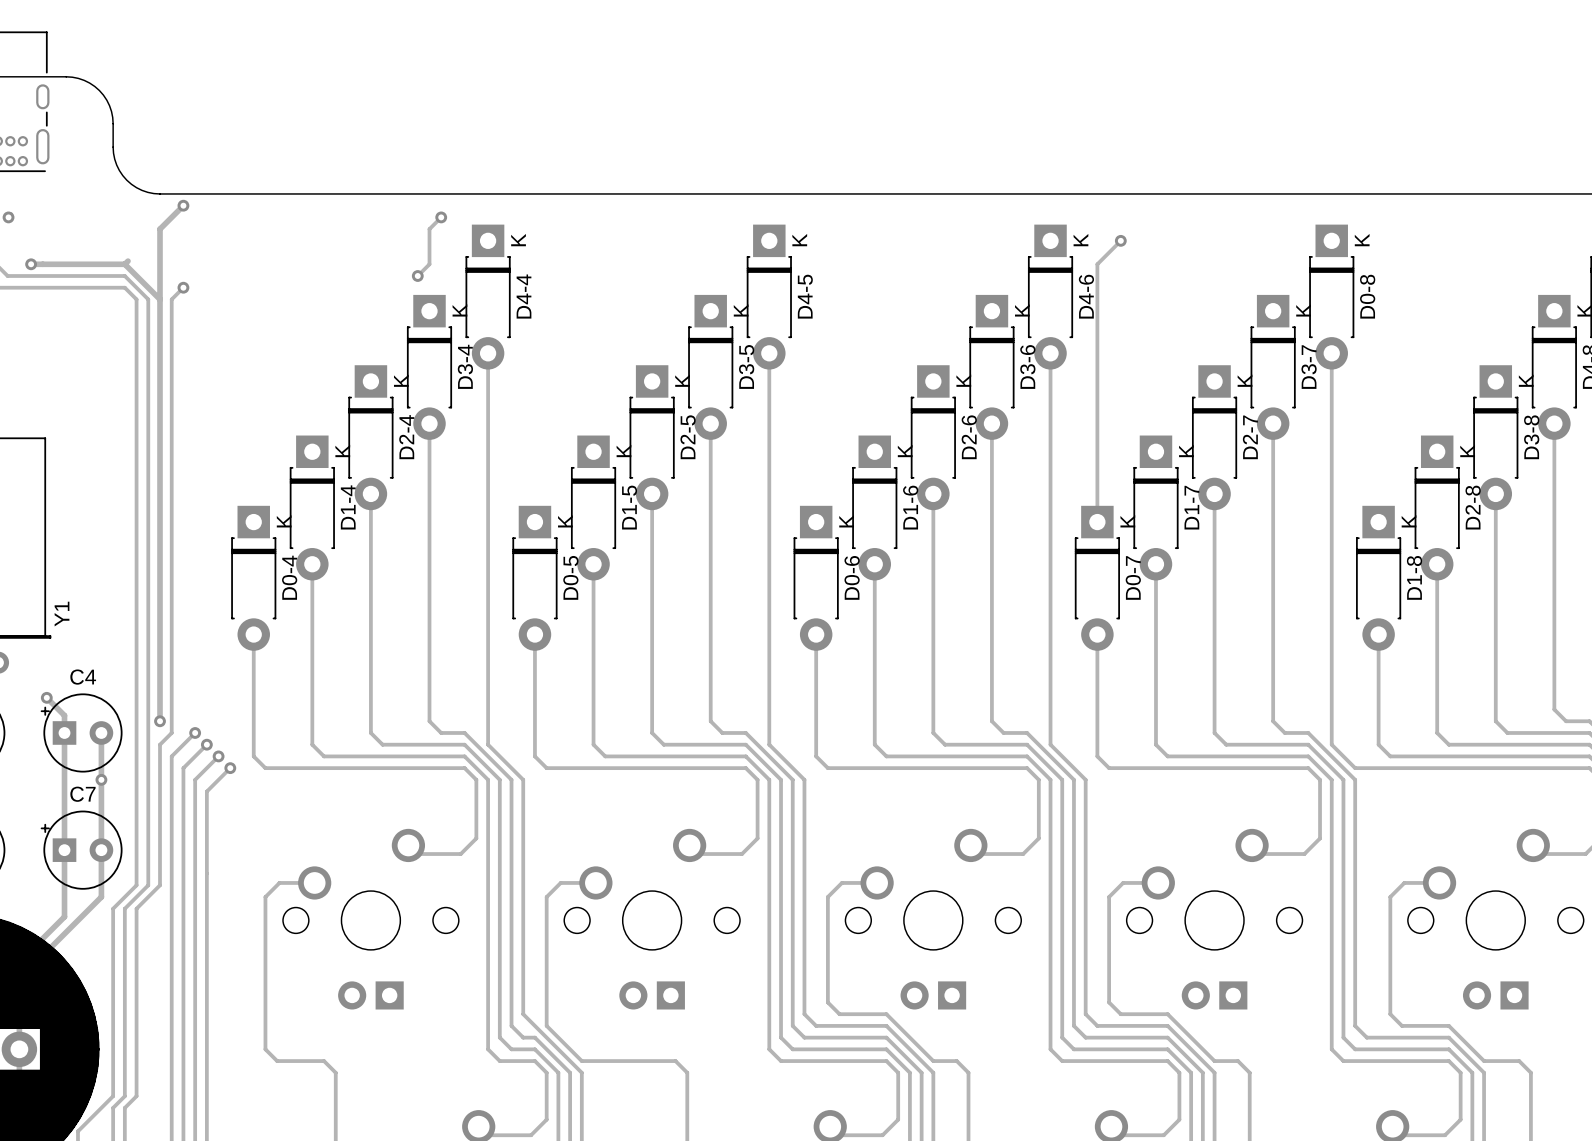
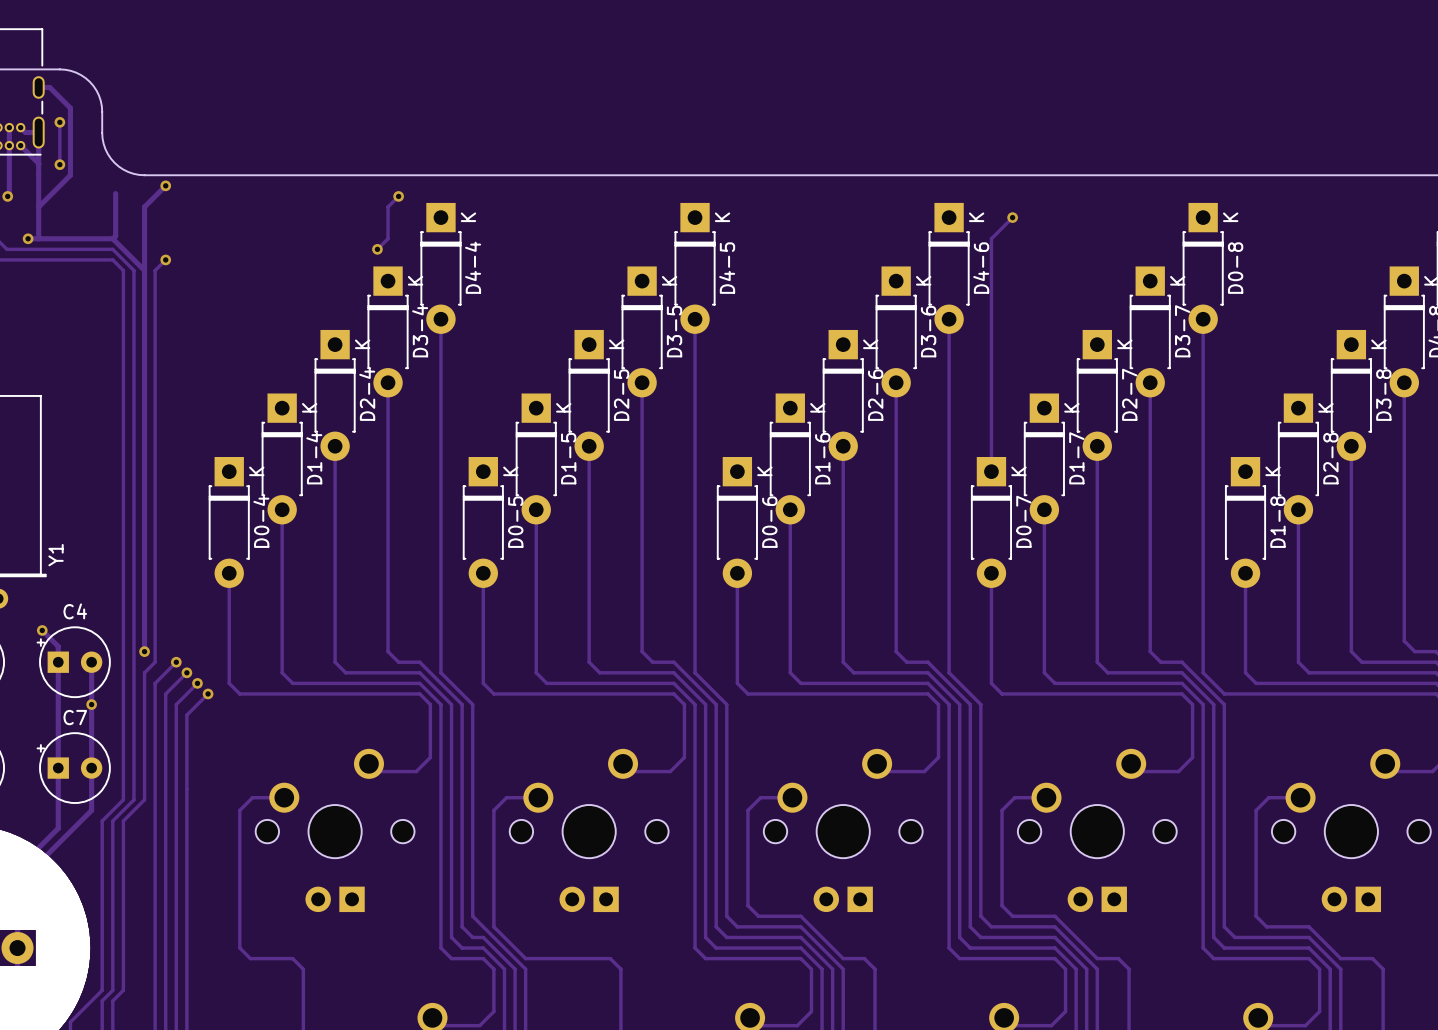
track: none -> (38, 87) (49, 87) (70, 108) (70, 175) (38, 207)
track: none -> (59, 122) (59, 164)
via: none -> (59, 122)
track: none -> (9, 127) (9, 194)
track: none -> (20, 127) (25, 132) (38, 132) (38, 238)
track: none -> (20, 145) (38, 163)
via: none -> (59, 164)
track: none -> (115, 193) (115, 235)

